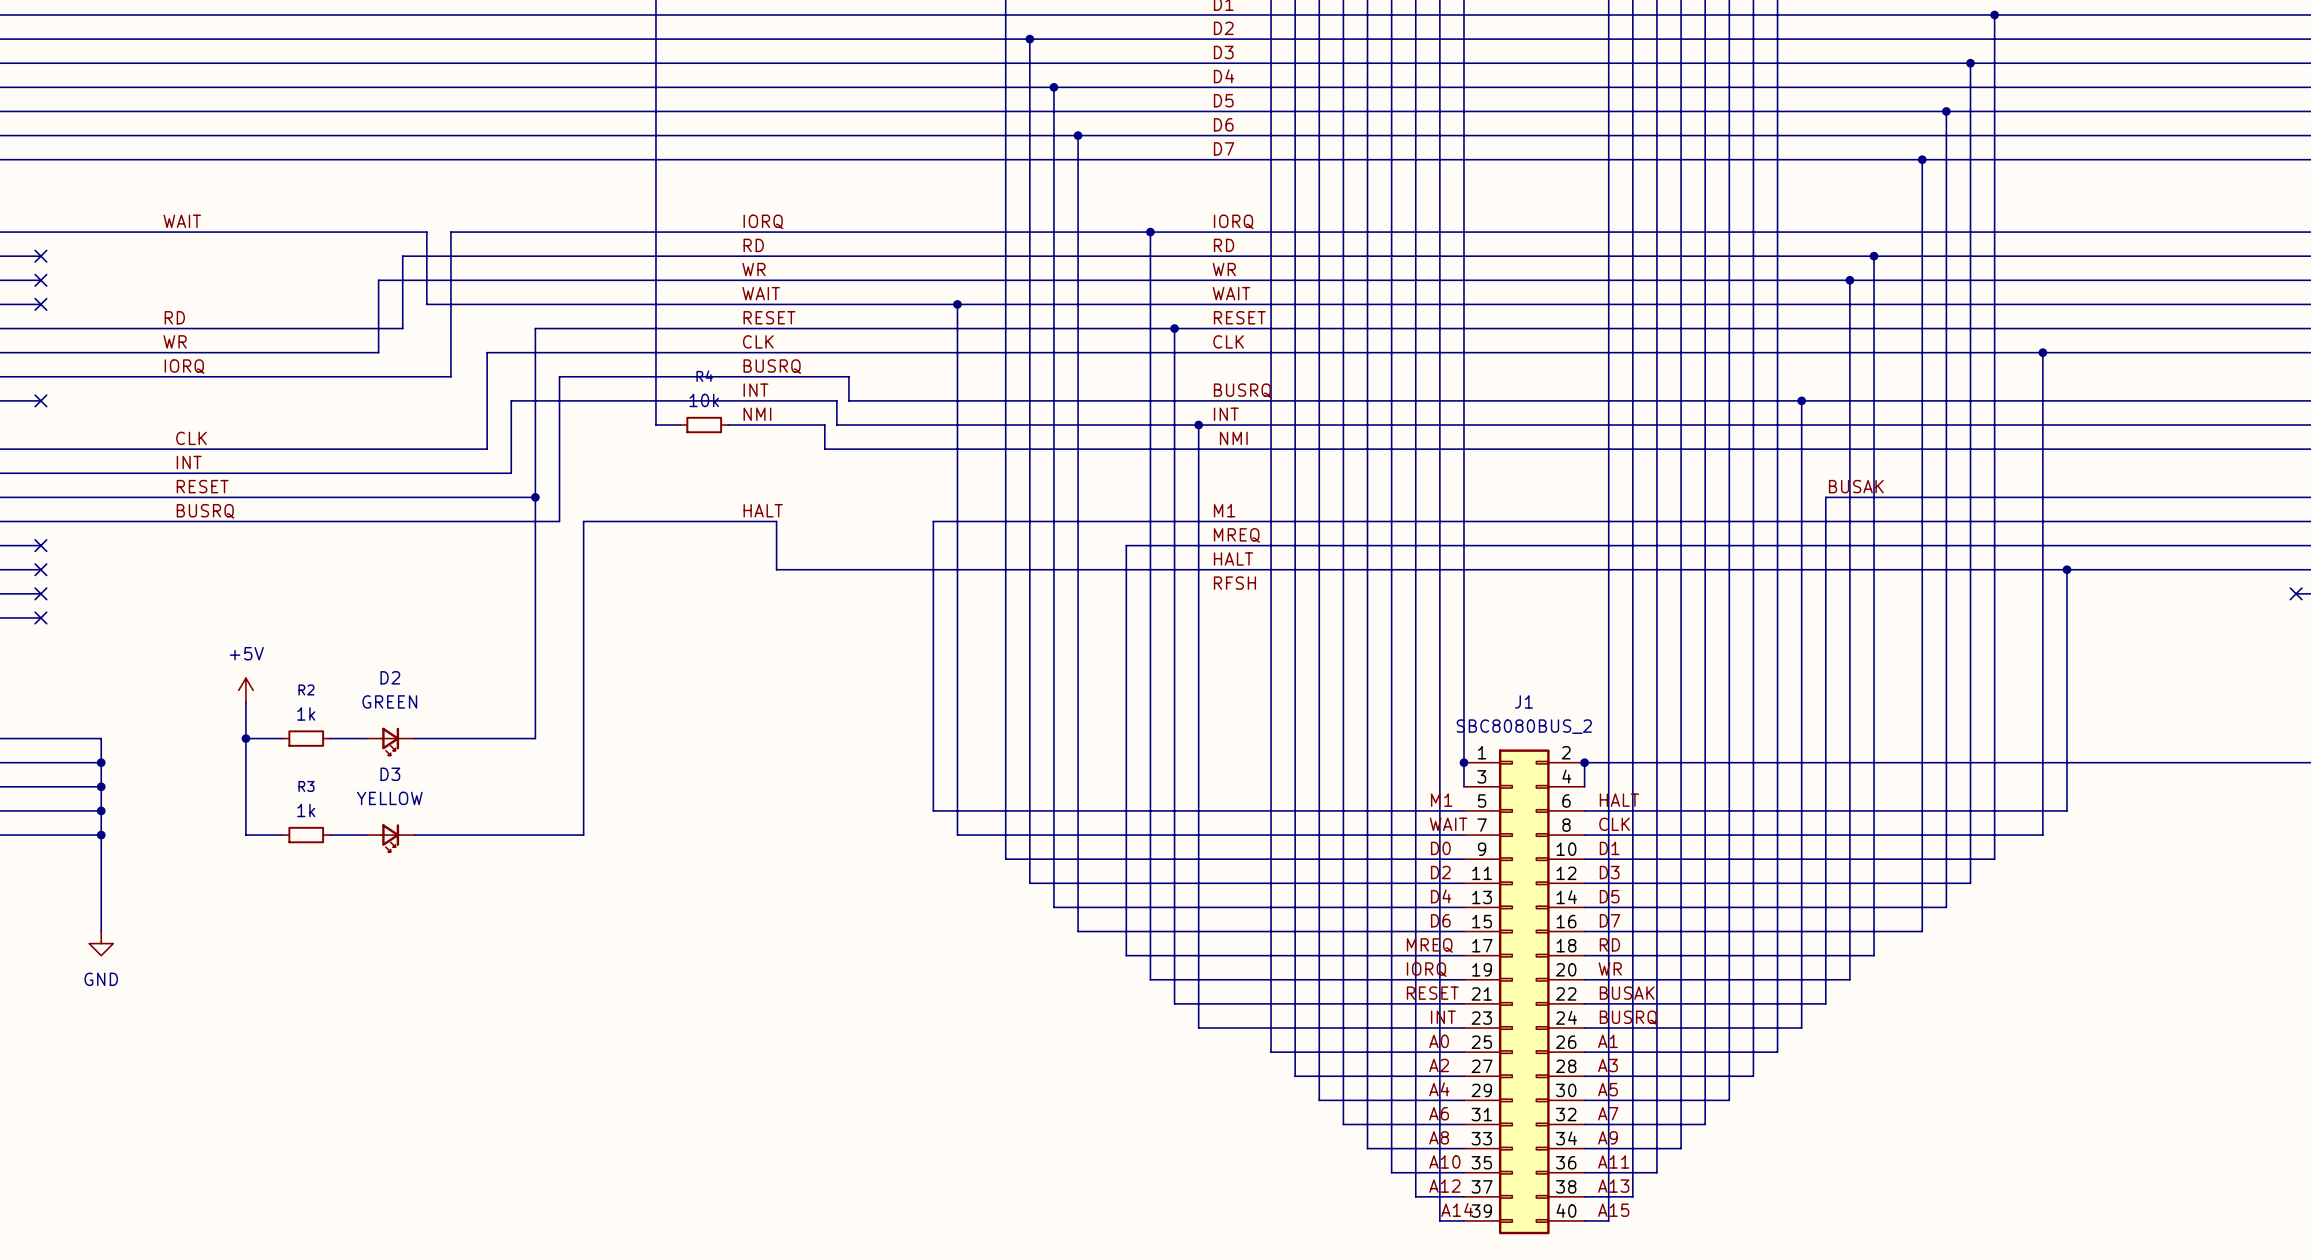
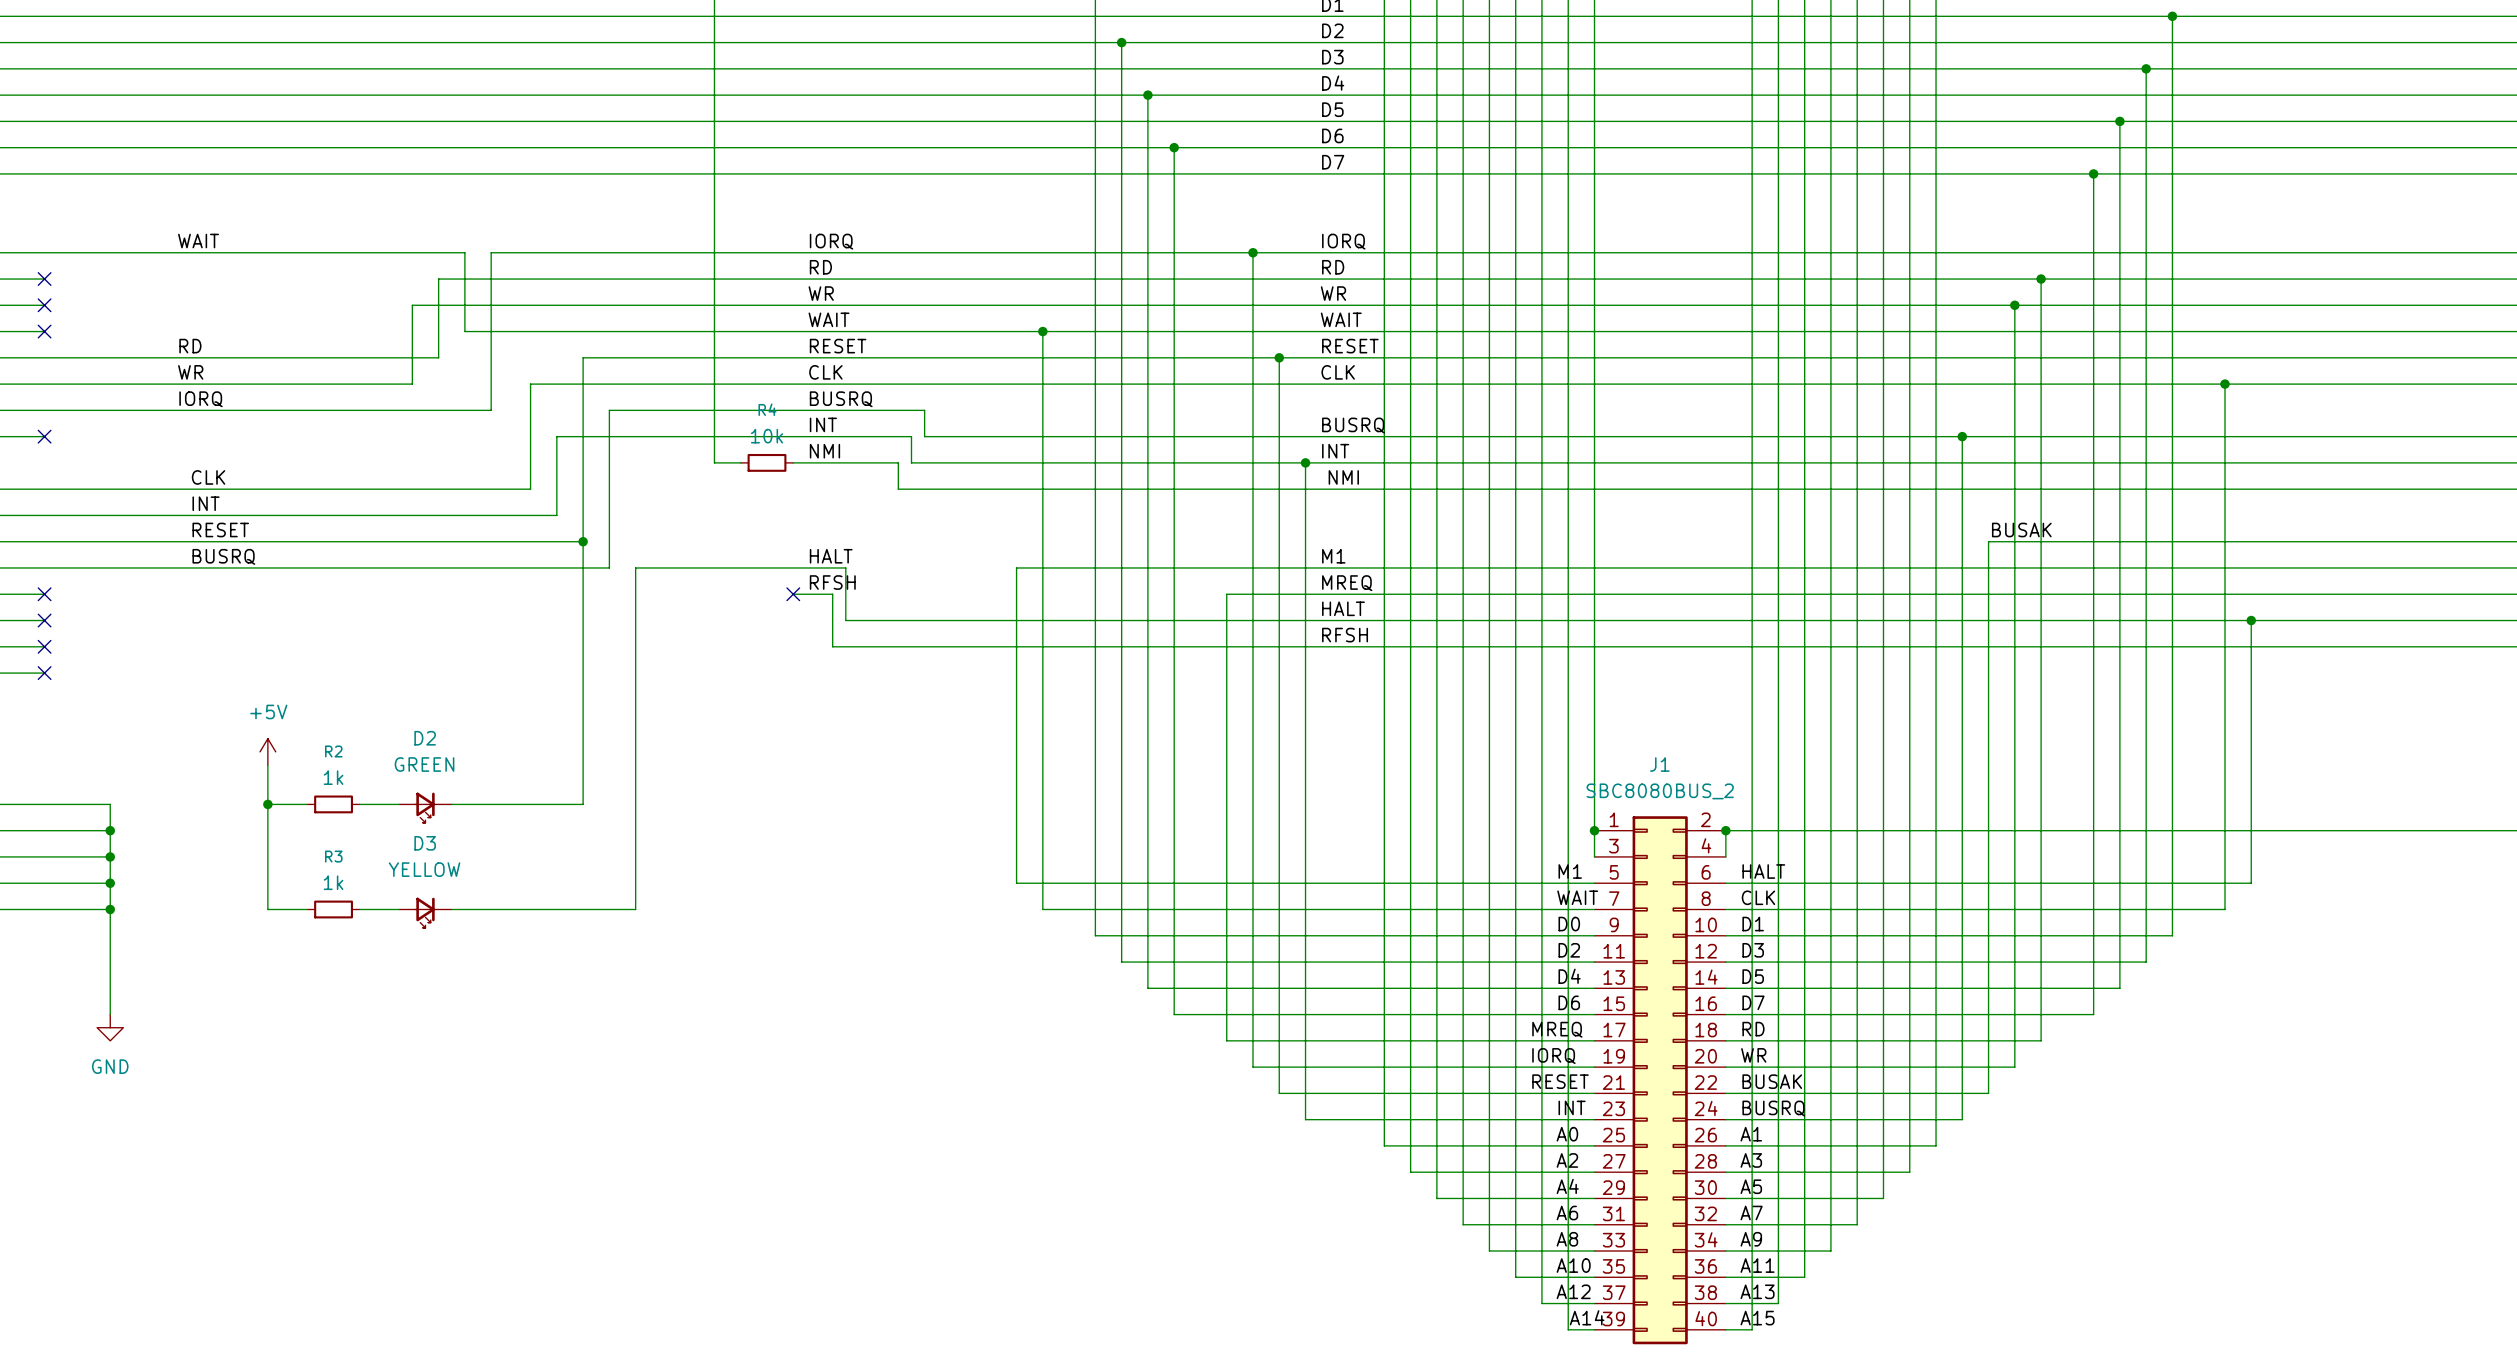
label: none -> RFSH (832, 582)
wire: none -> (793, 594) (832, 594) (832, 646) (2500, 646)
no-connect mark: none -> (793, 594)
no-connect mark: (2296, 593) -> none

